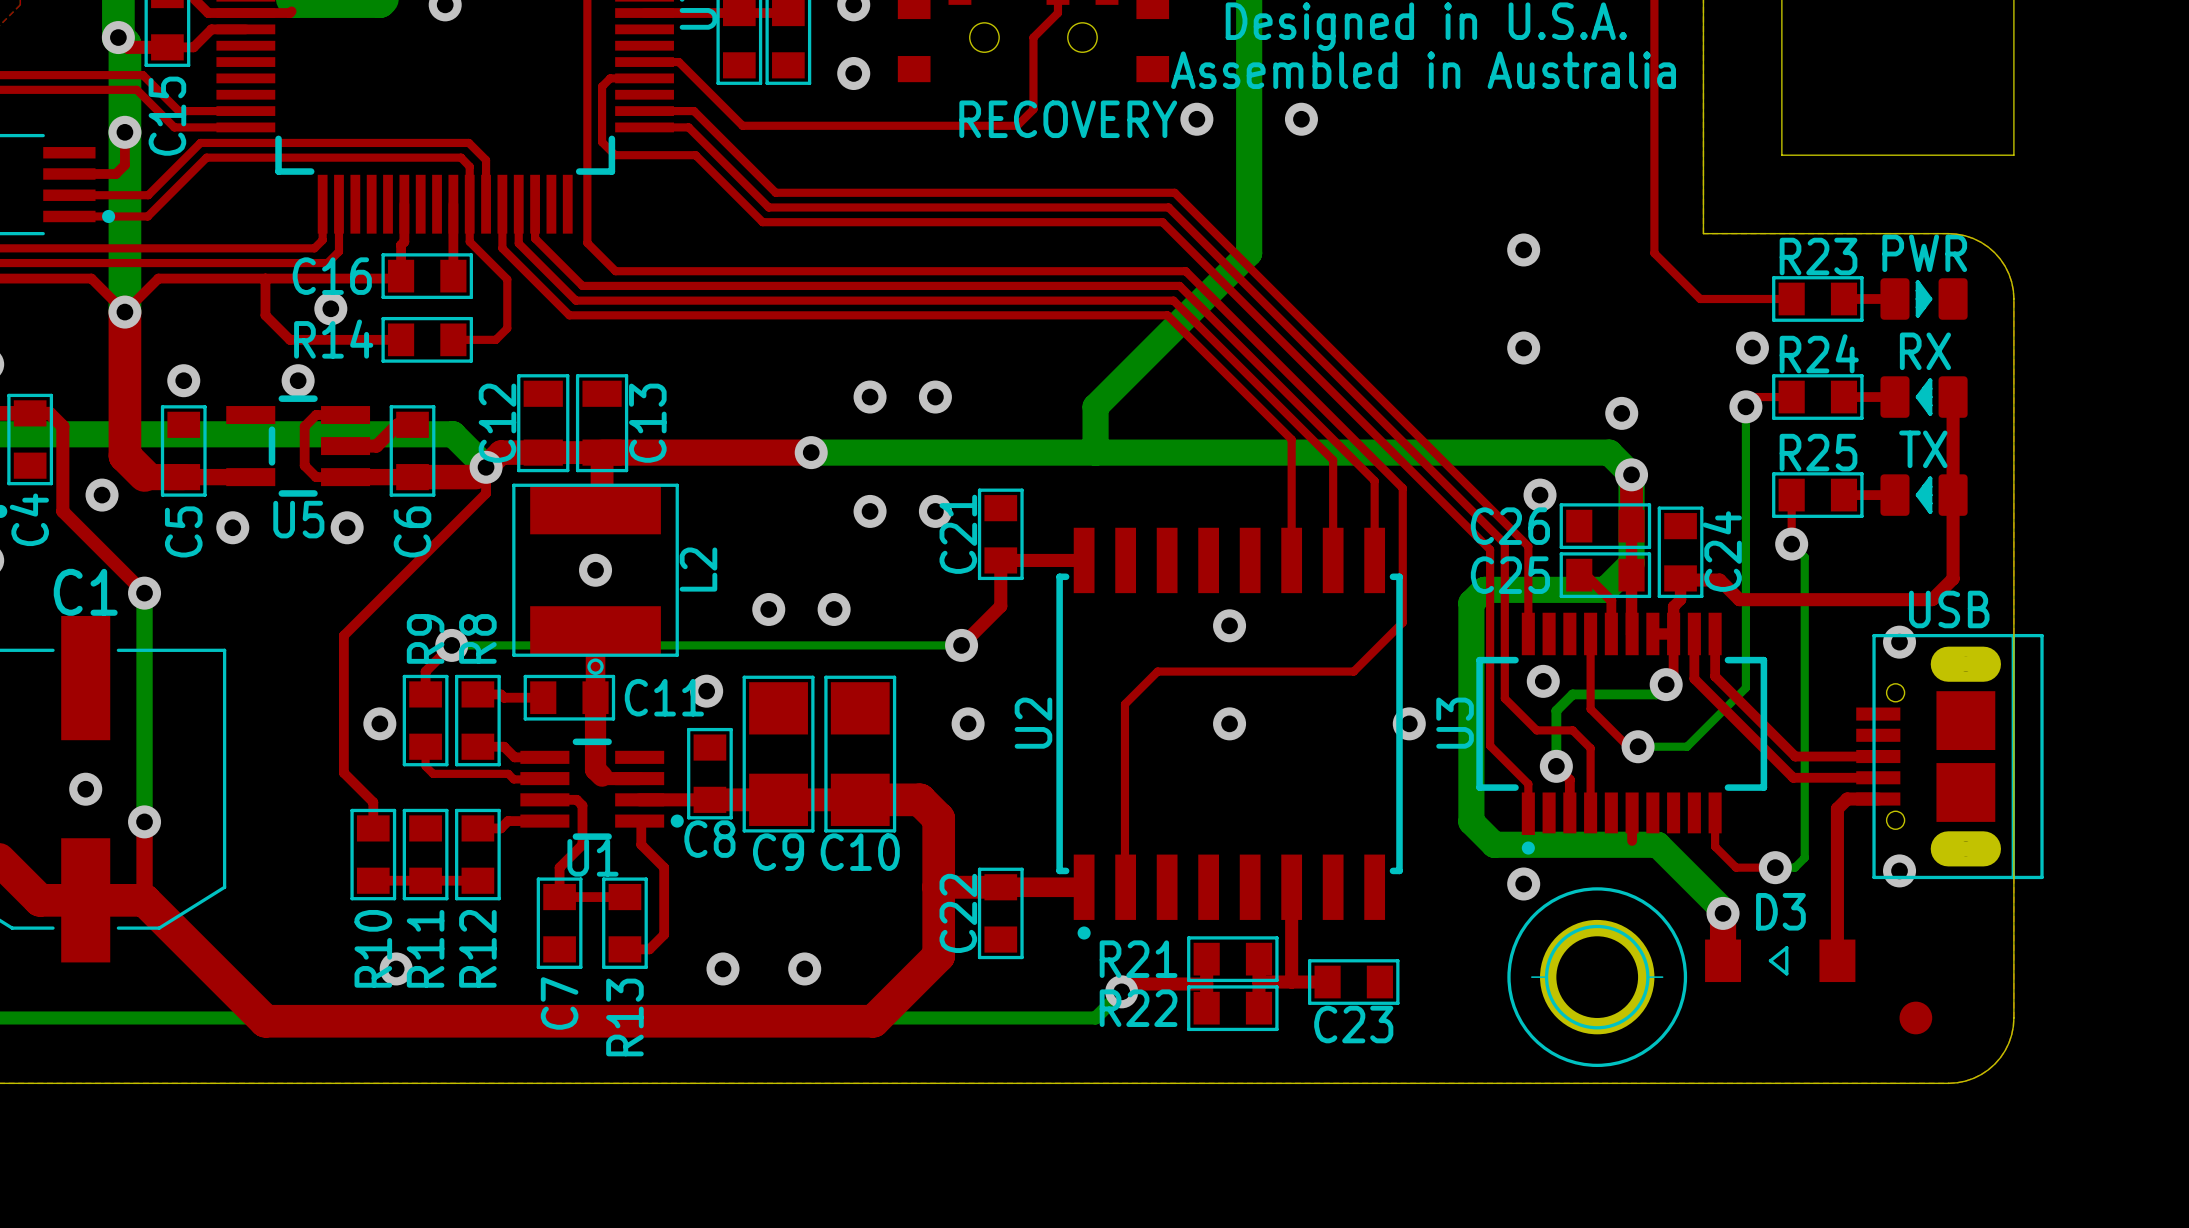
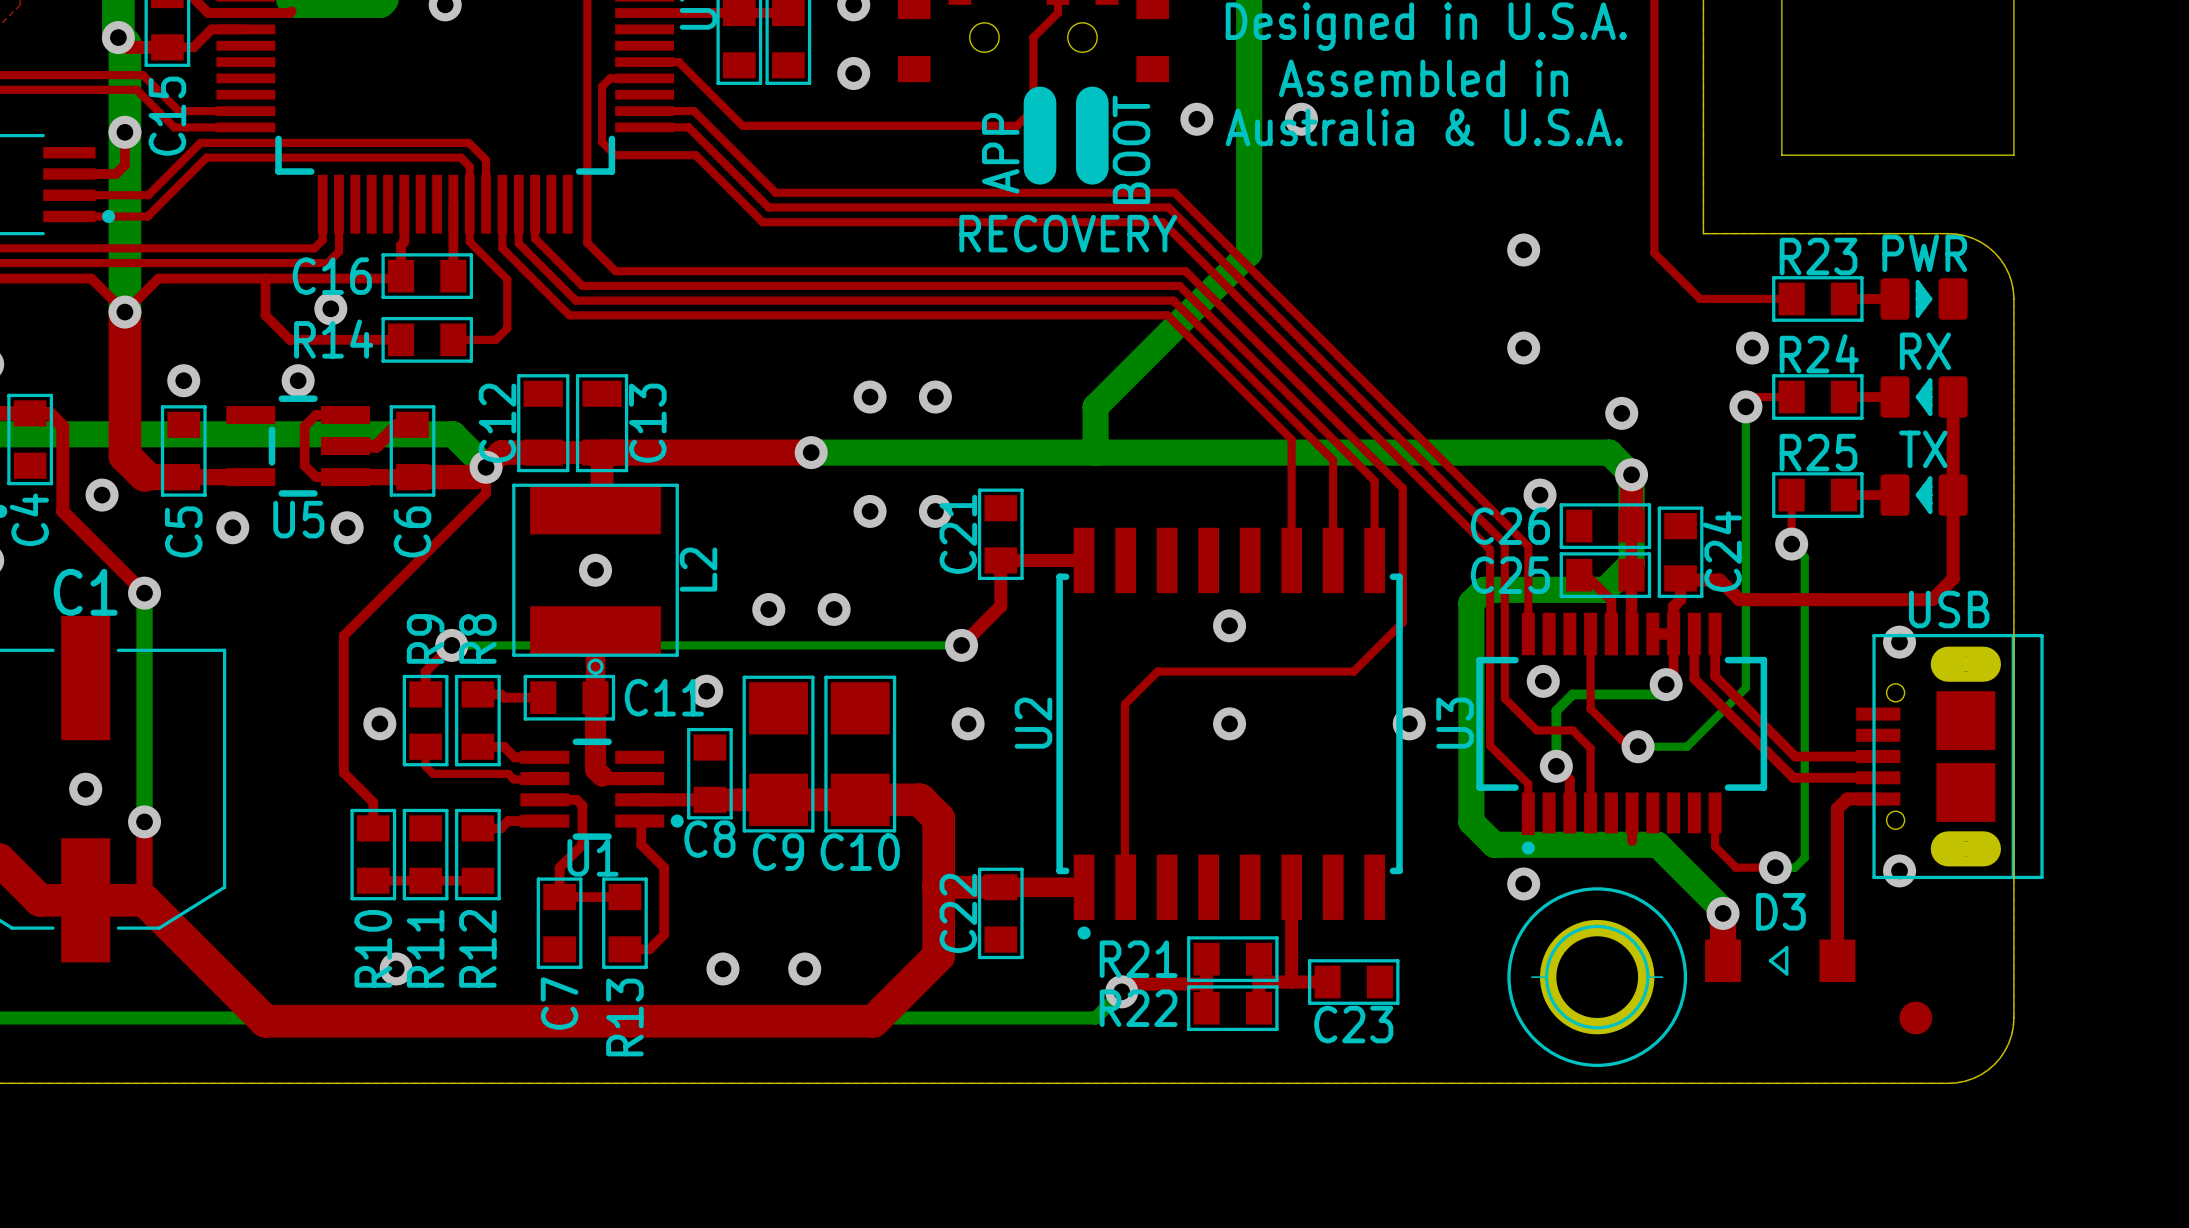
text: Assembled in Australia (1423, 70) -> Assembled in (1423, 78)
line: none -> (1040, 102) (1040, 168)
line: none -> (1092, 102) (1092, 168)
text position: RECOVERY (1068, 119) -> RECOVERY (1068, 233)
text: none -> Australia & U.S.A. (1424, 127)
text: none -> BOOT (1131, 149)
text: none -> APP (1000, 153)

